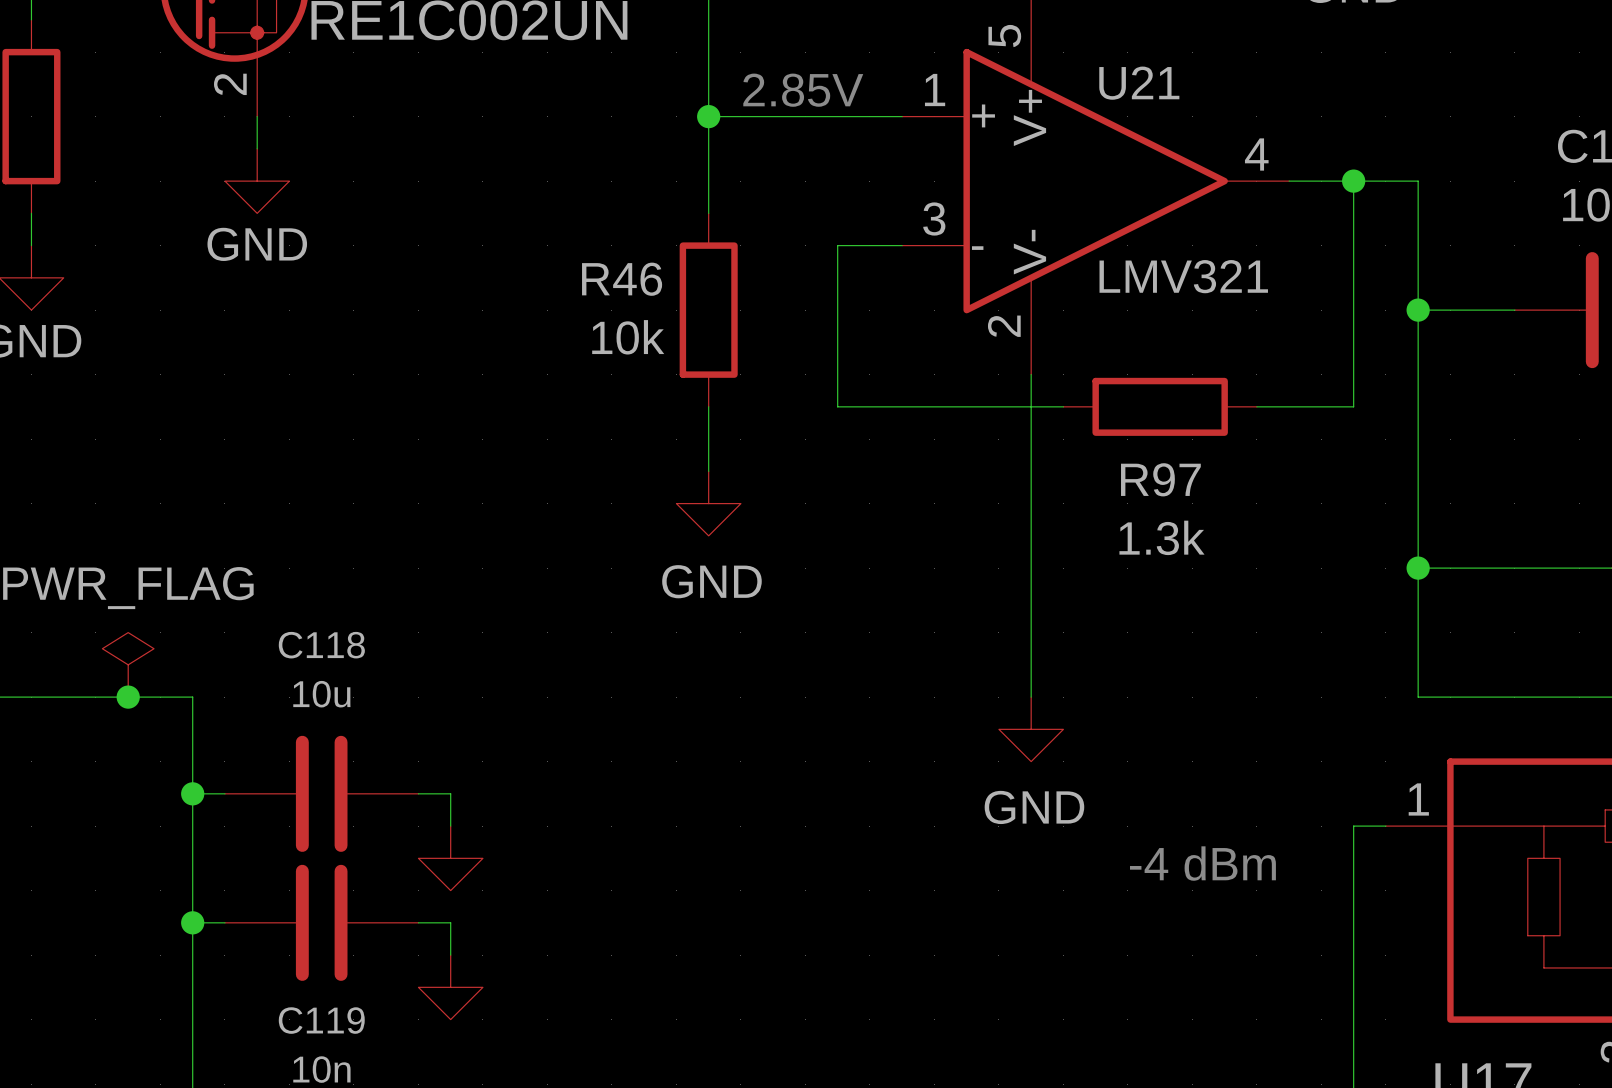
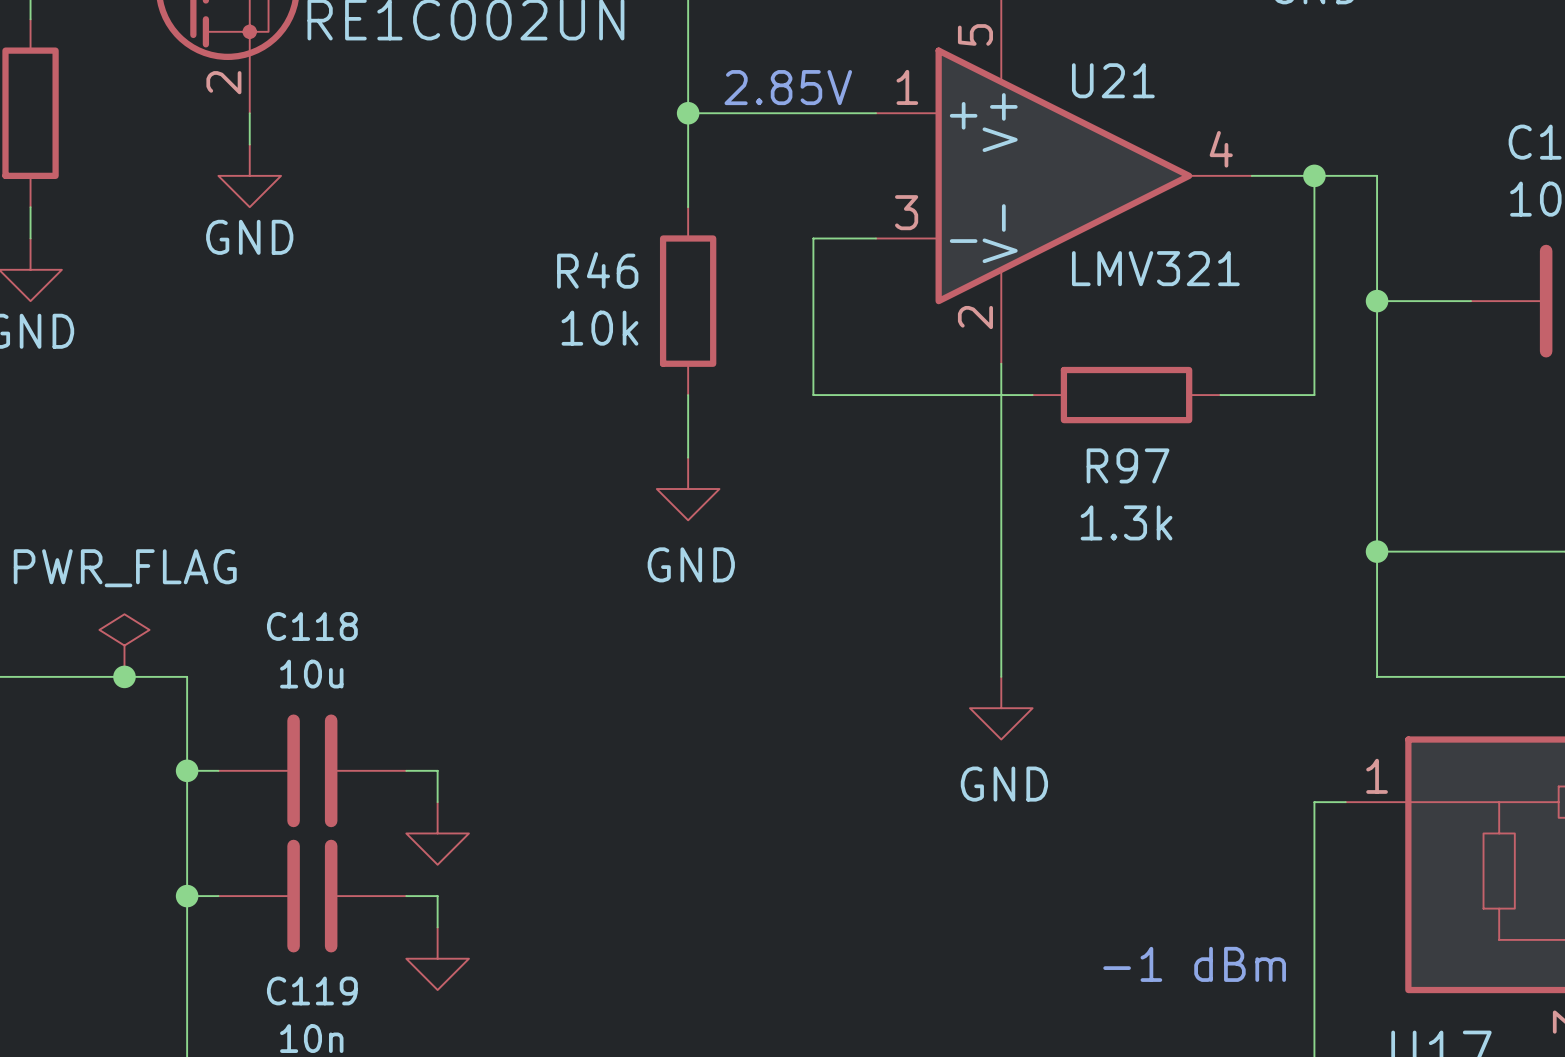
text: -4 dBm (1202, 863) -> none
text: none -> -1 dBm (1194, 964)

